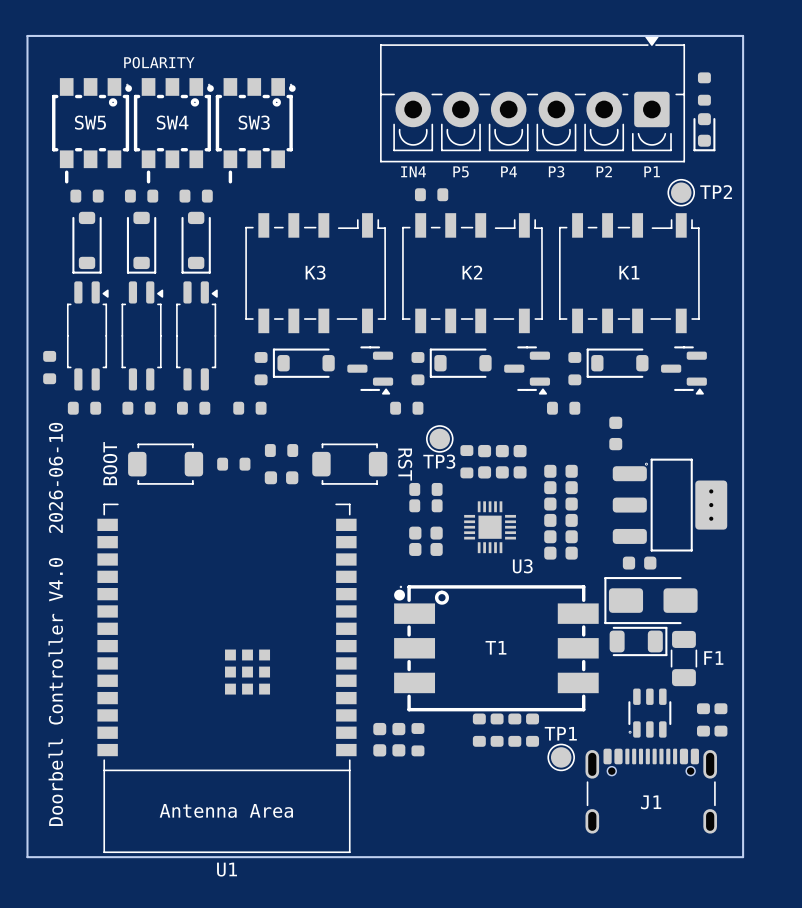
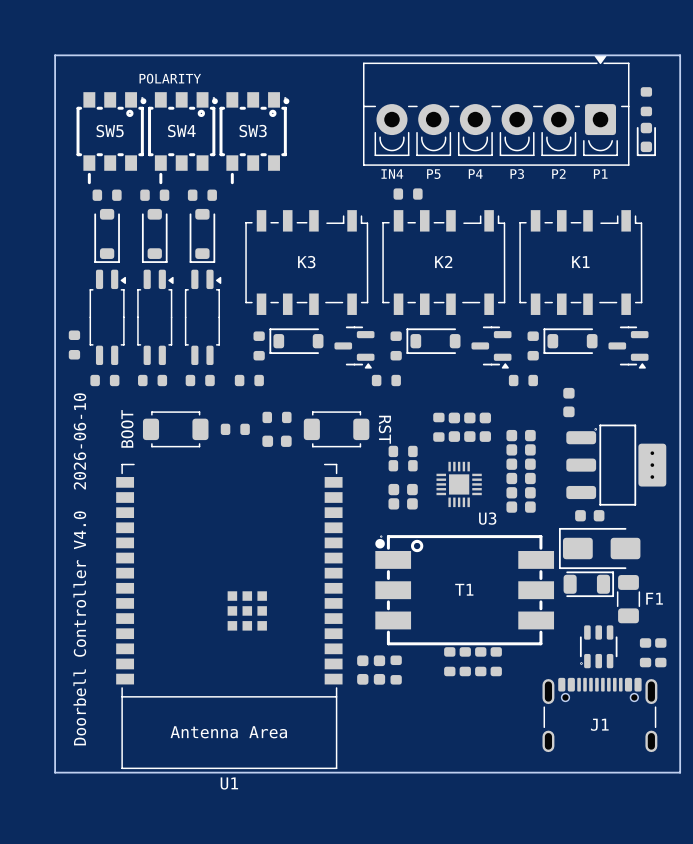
TP2: (681, 192) -> none
TP3: (439, 438) -> none
TP1: (561, 757) -> none

